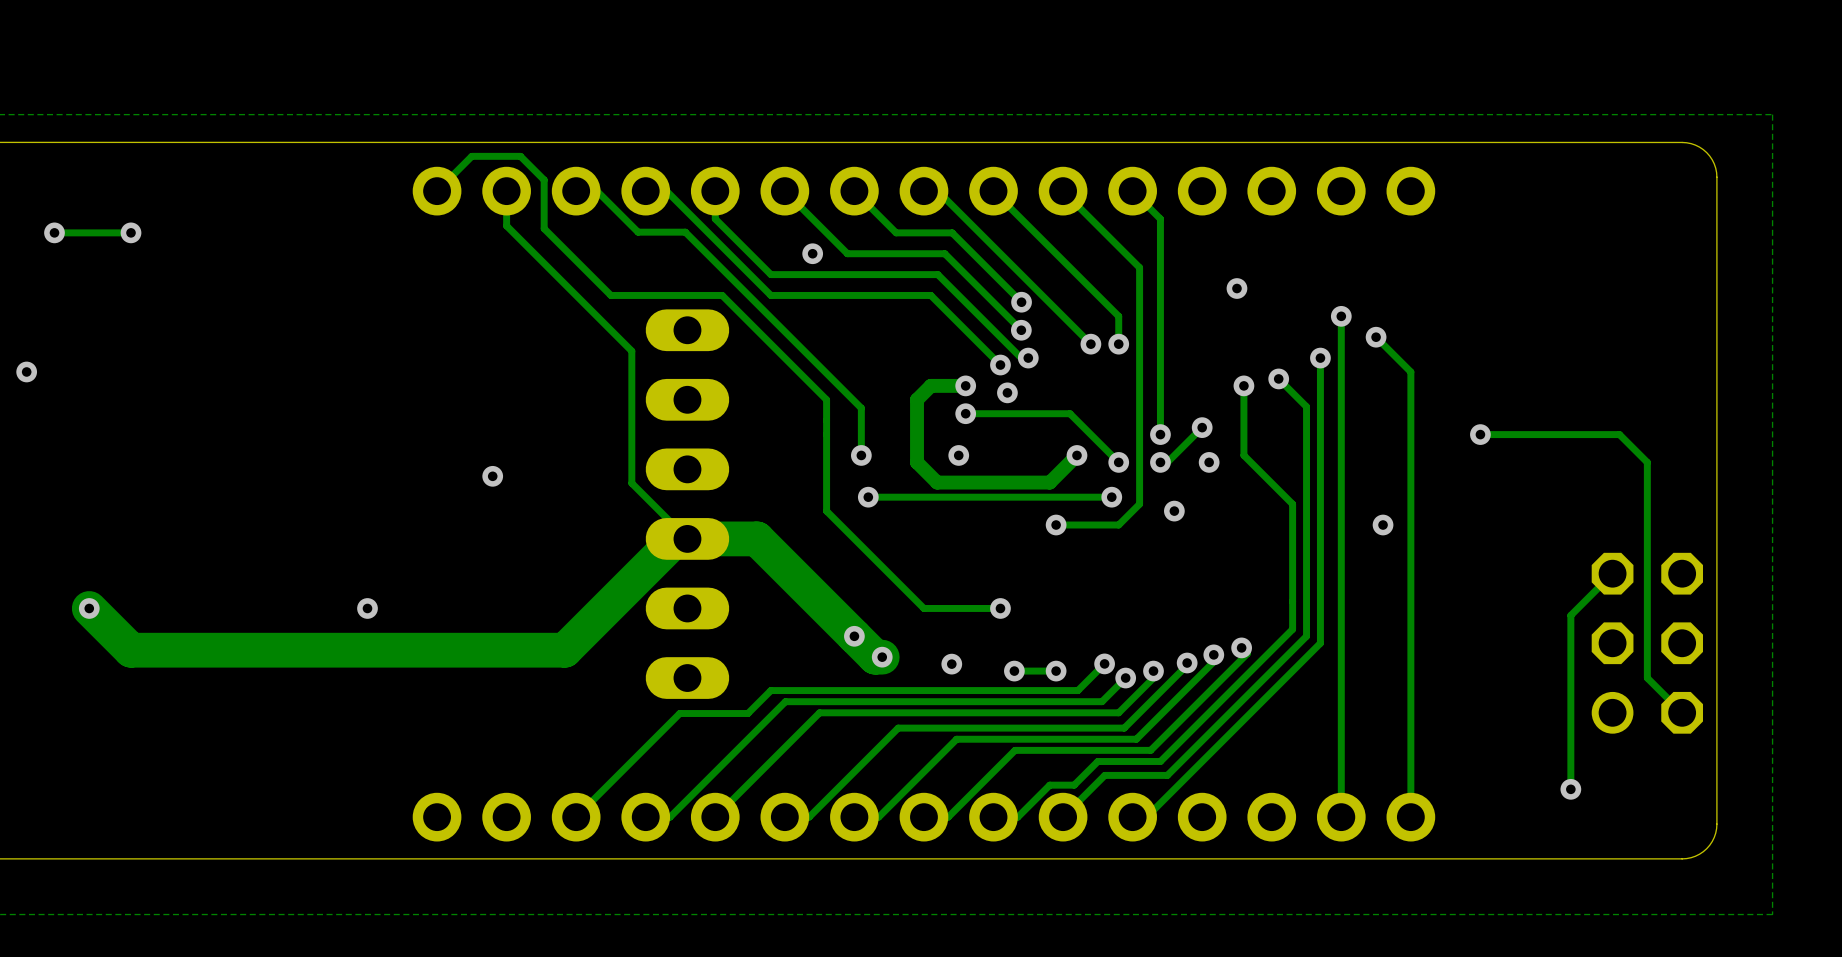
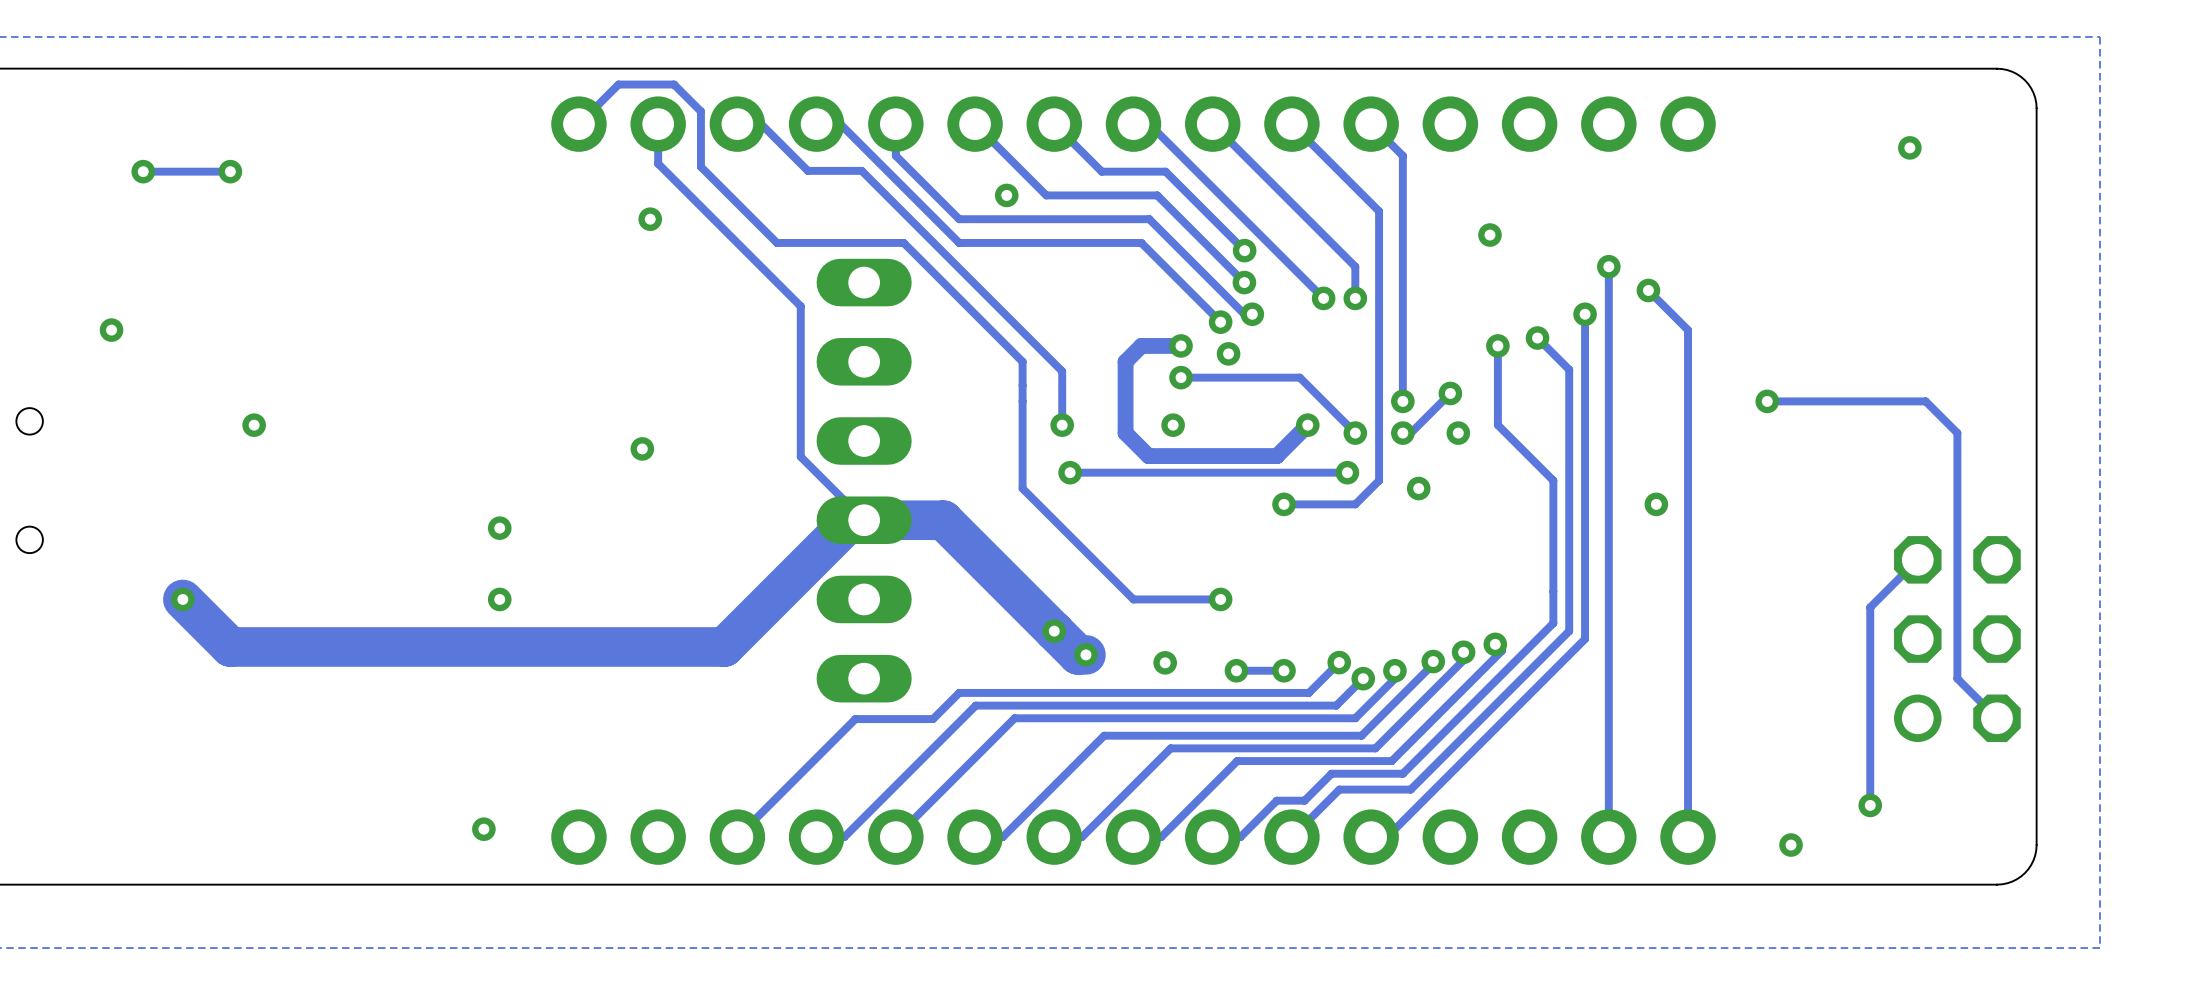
via: none -> (1909, 147)
via: none -> (650, 219)
via: none -> (254, 425)
via: none -> (499, 528)
via: none -> (483, 829)
via: none -> (1791, 845)

